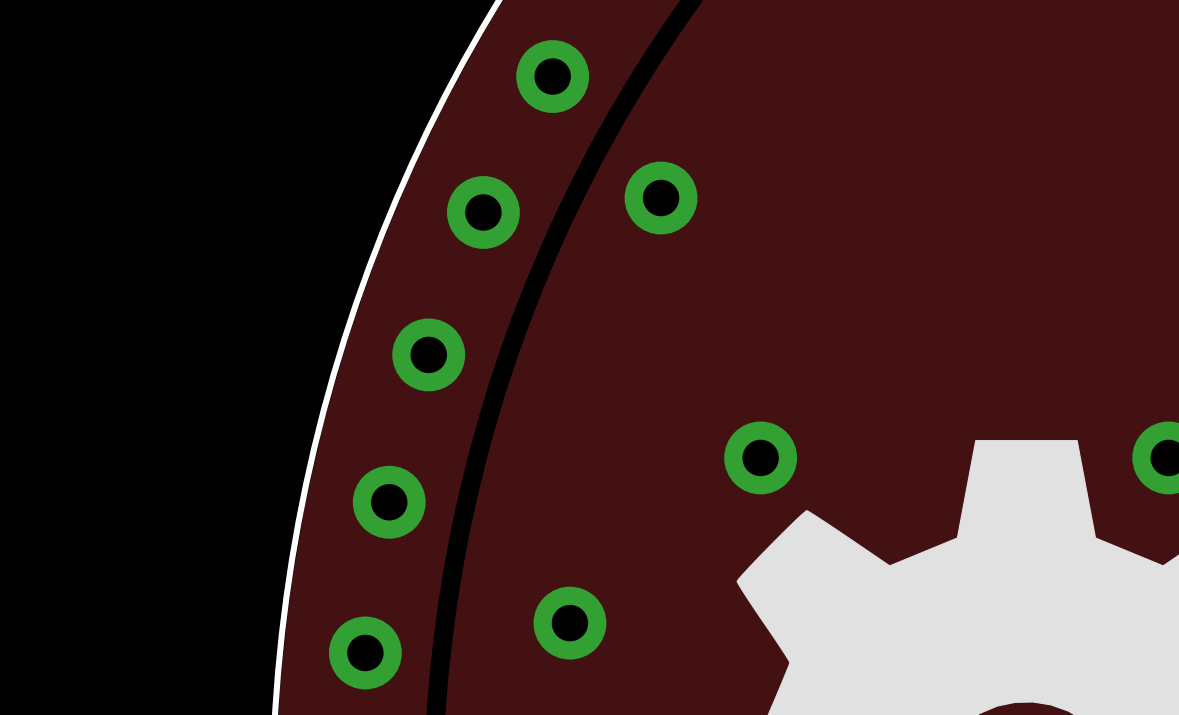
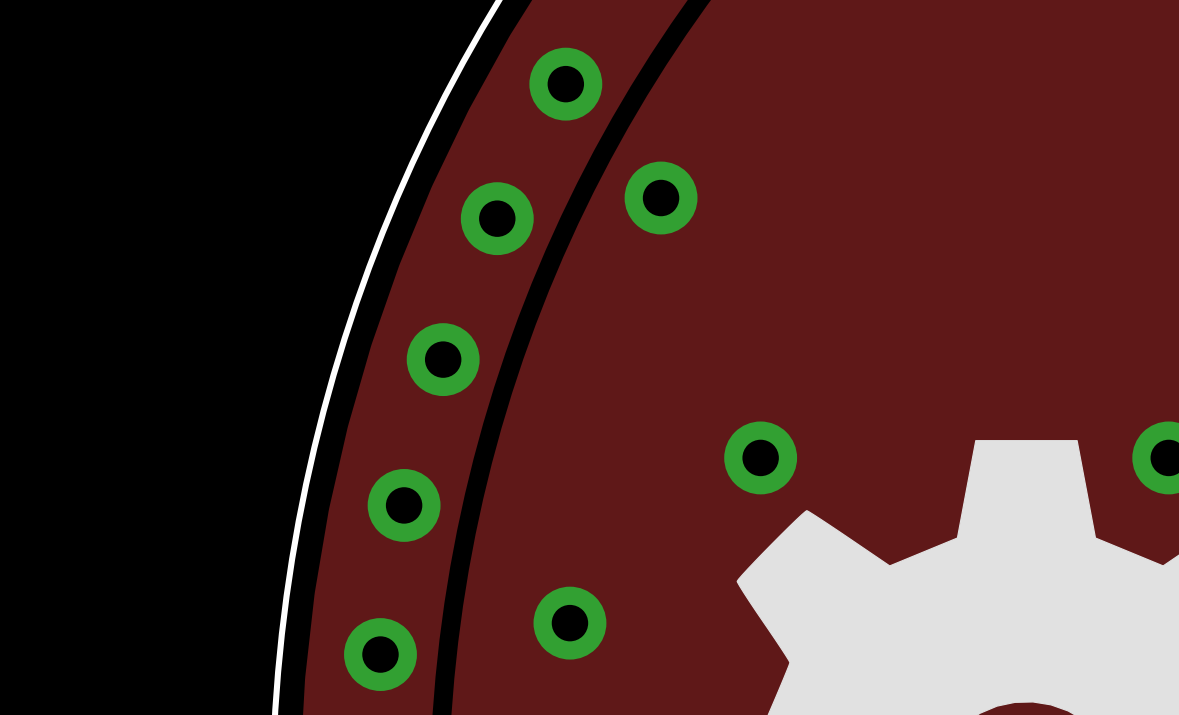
via position: (552, 76) -> (565, 84)
via position: (483, 212) -> (497, 218)
via position: (428, 354) -> (443, 359)
via position: (389, 502) -> (404, 505)
via position: (365, 652) -> (380, 654)

